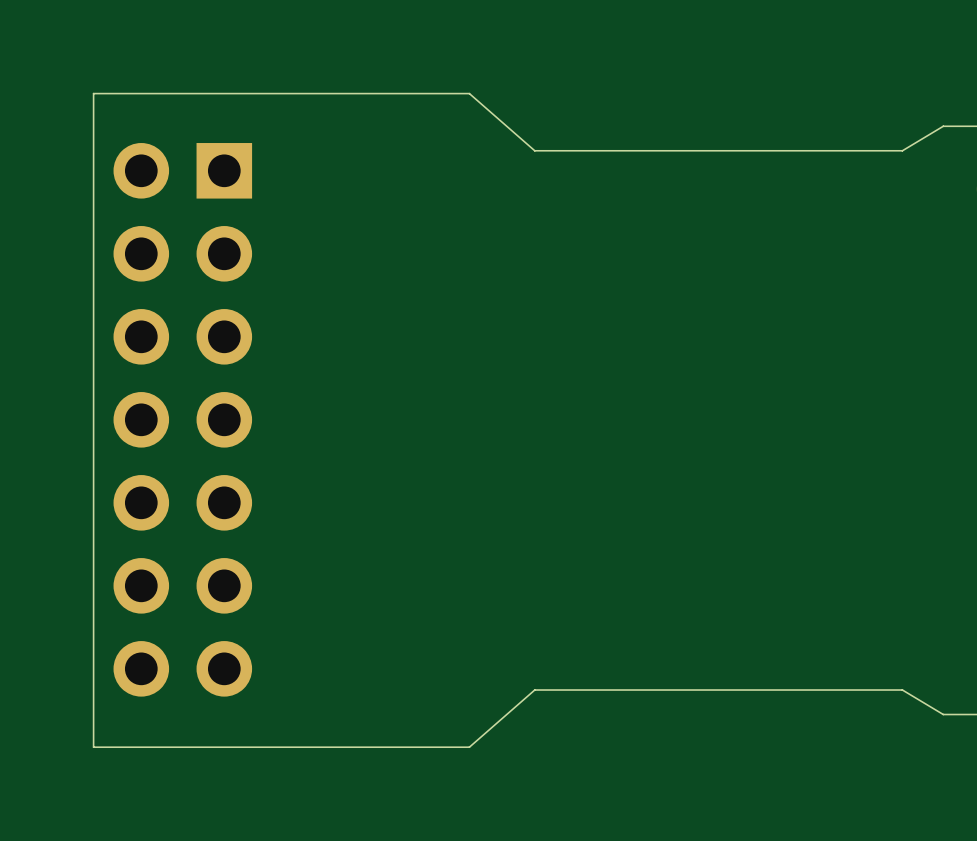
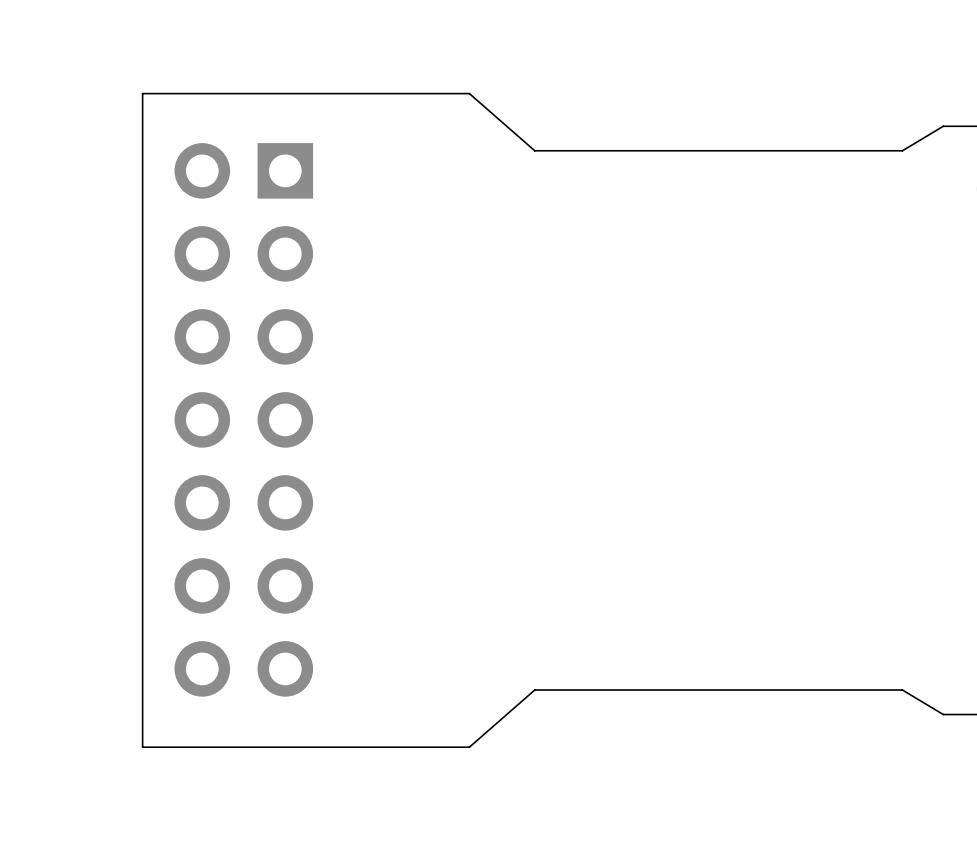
board edge: (142, 93) (93, 93) (93, 747) (142, 747) -> (142, 93) (142, 747)
part position: (182, 419) -> (243, 419)

